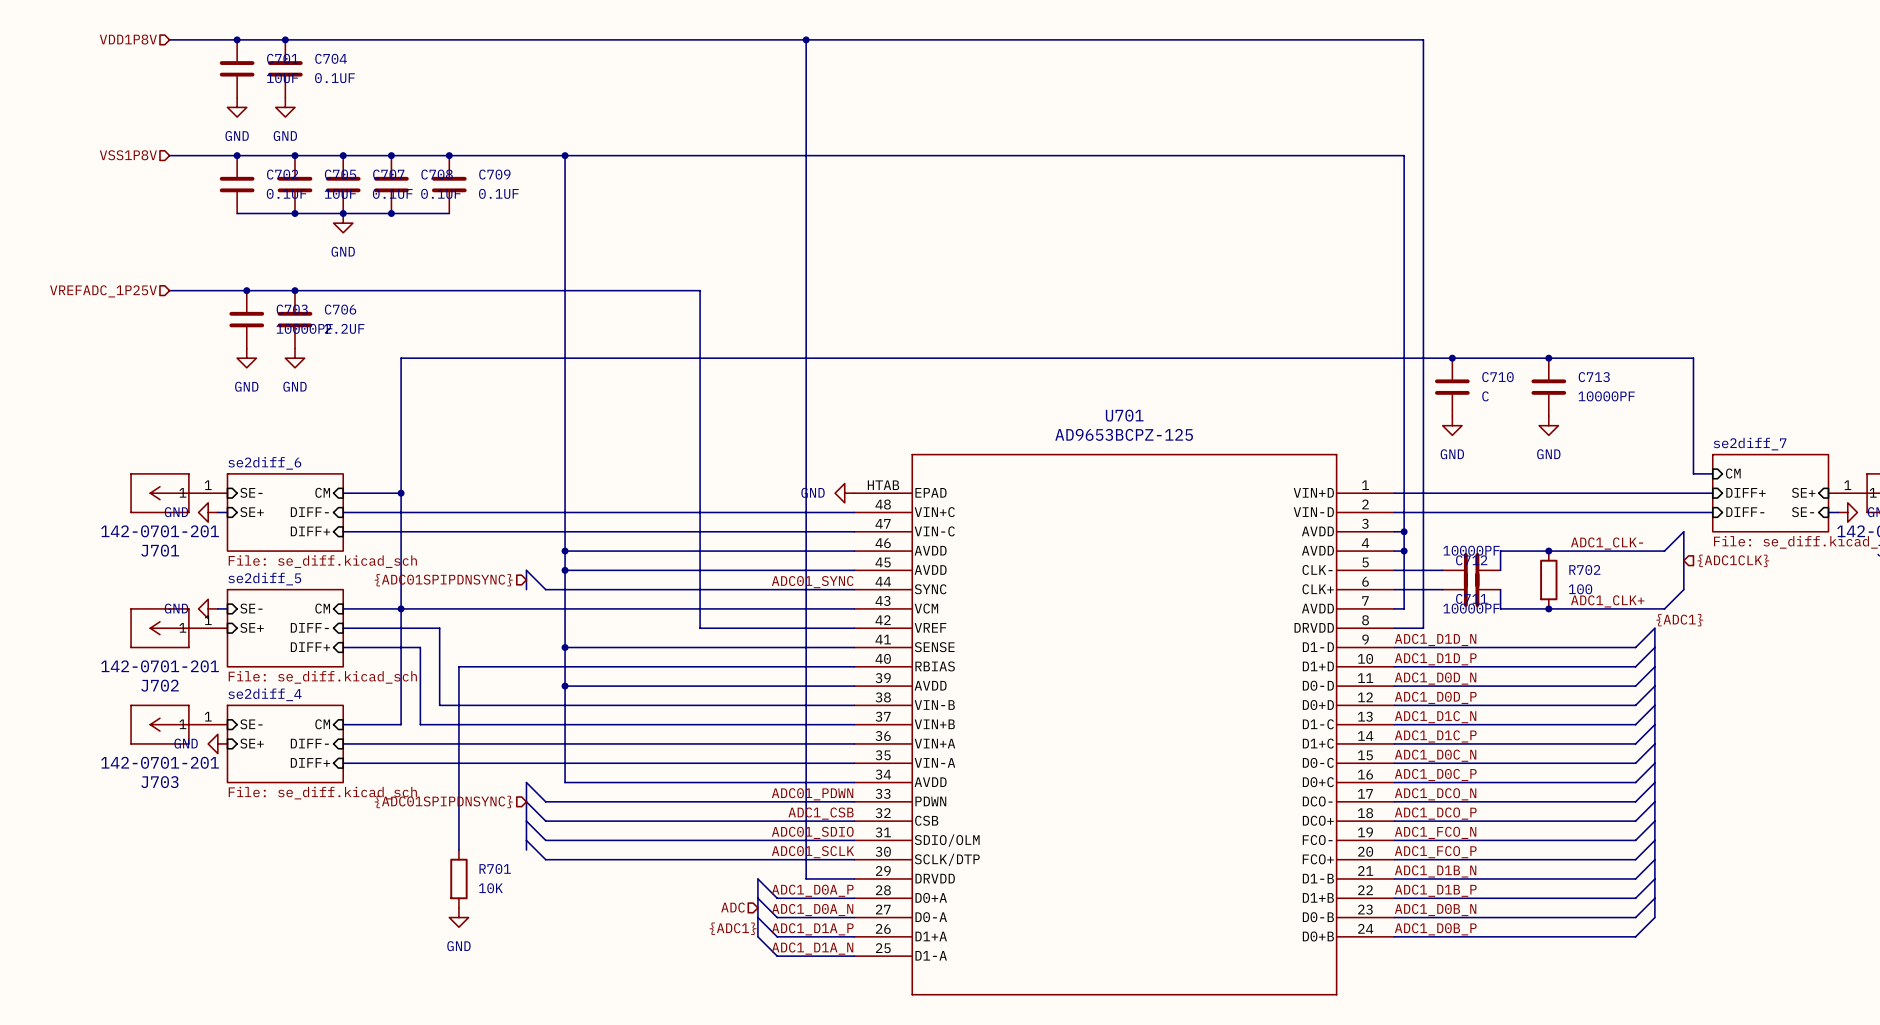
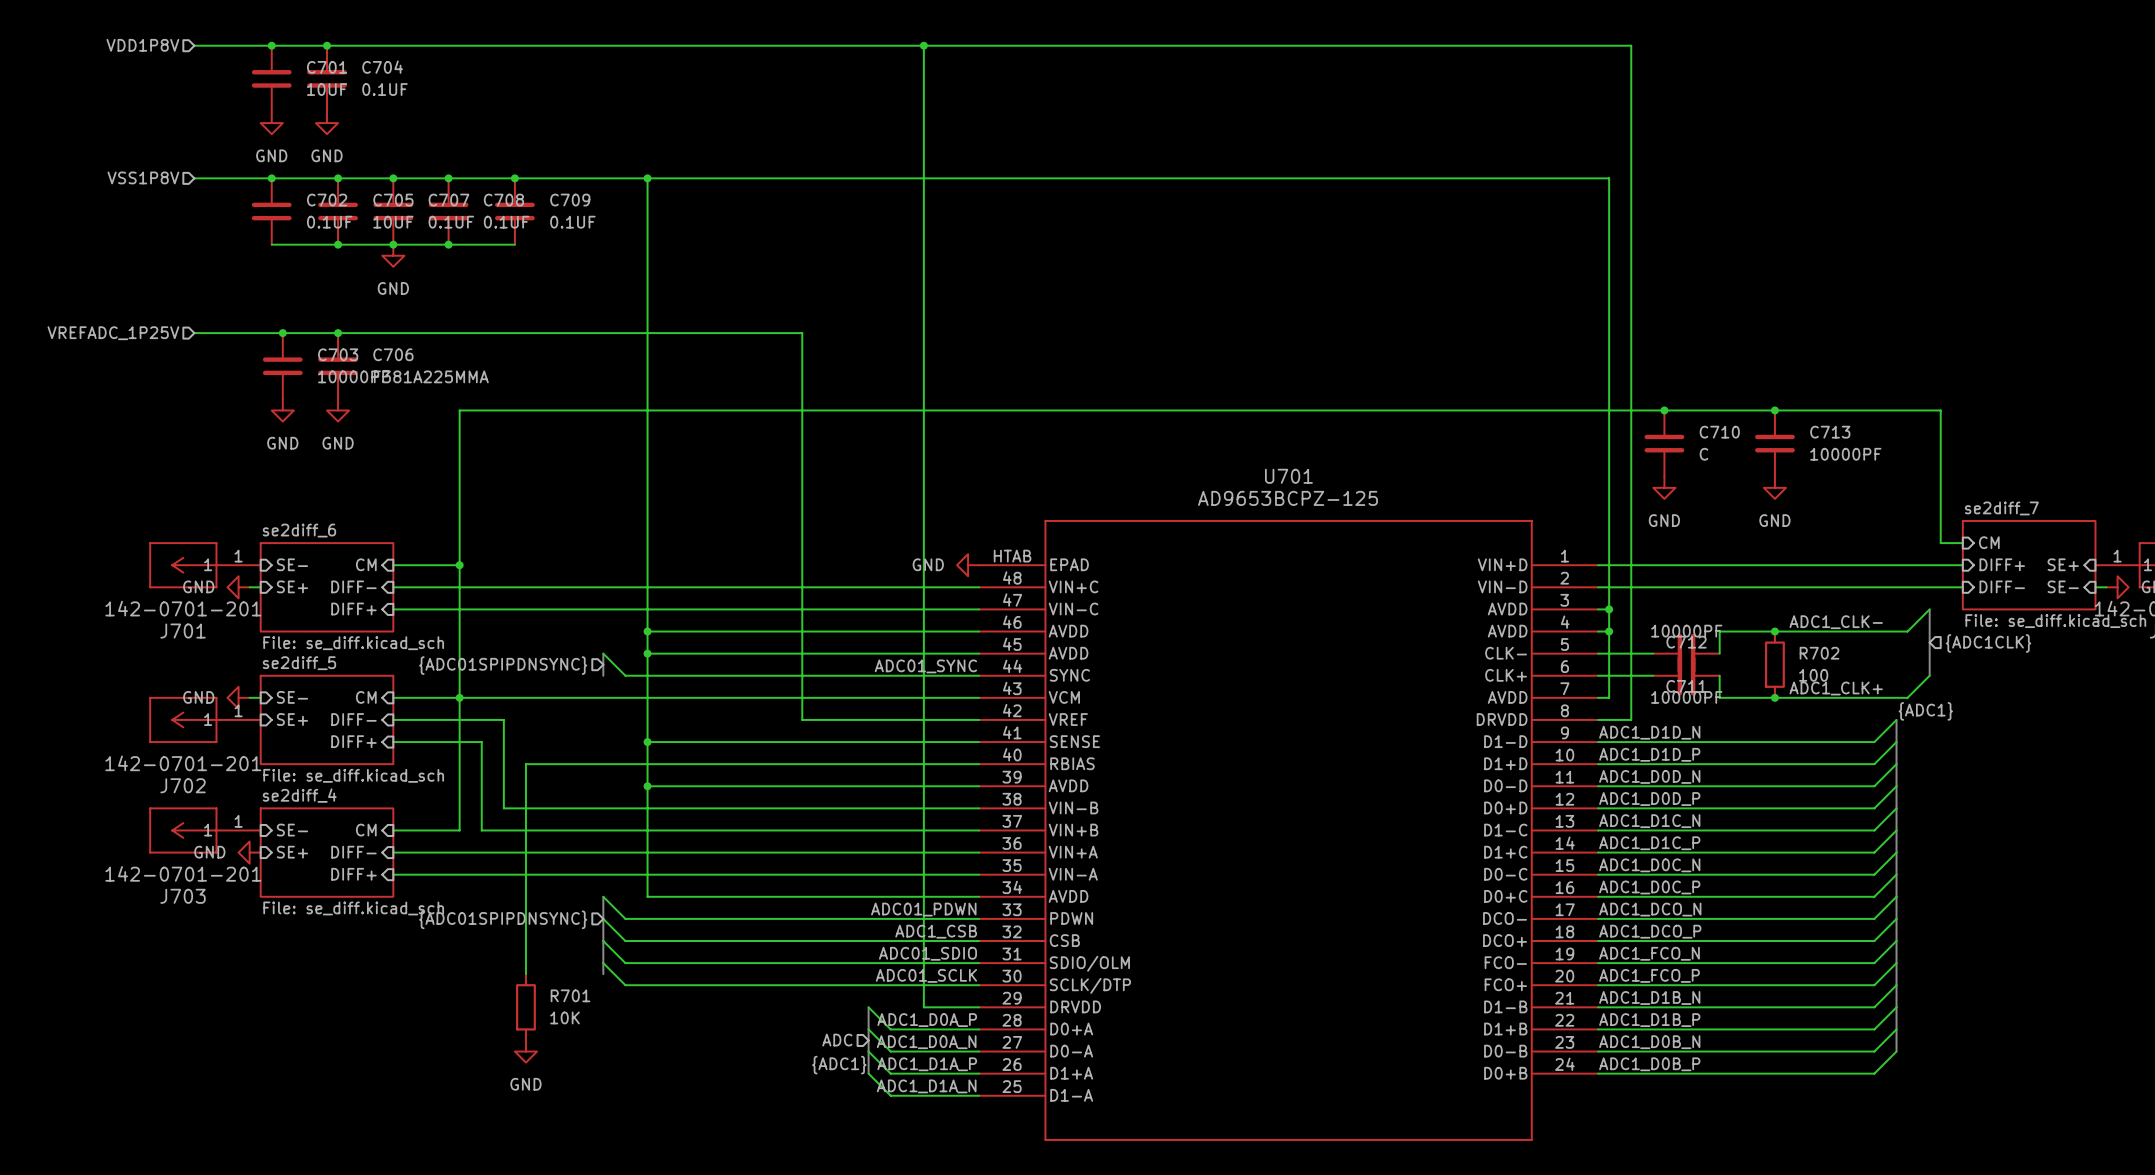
C706 value: 2.2UF (344, 328) -> F381A225MMA (431, 376)

